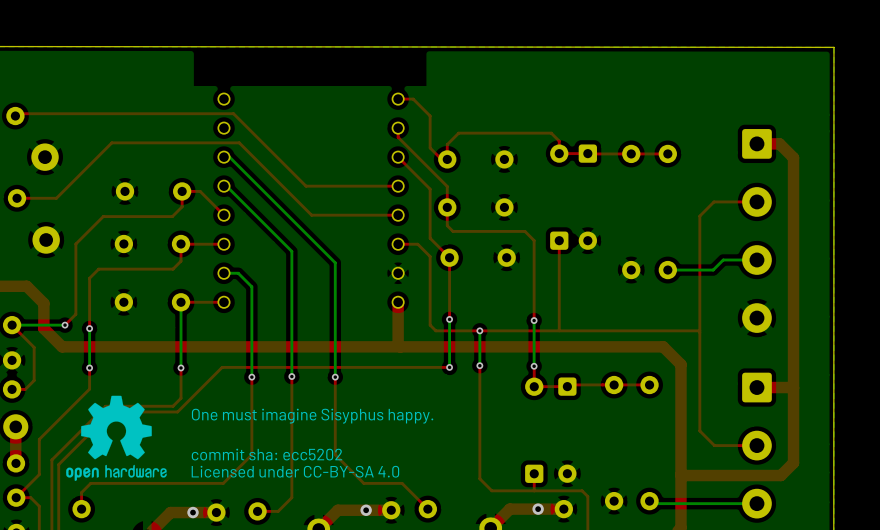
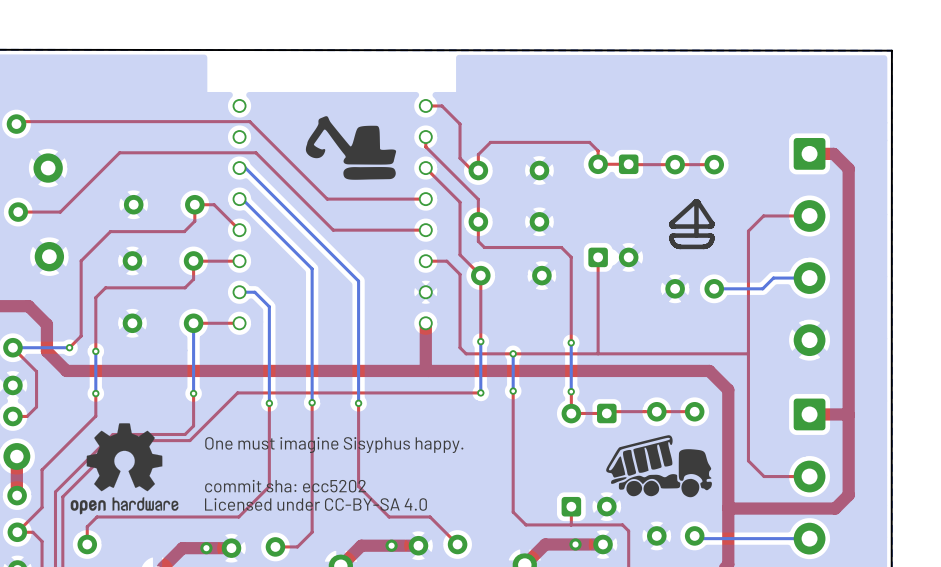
drawing: none -> [305, 116, 397, 180]
line: none -> (696, 201) (696, 235)
line: none -> (694, 202) (672, 222)
line: none -> (698, 202) (711, 222)
line: none -> (710, 226) (673, 226)
line: none -> (710, 235) (673, 235)
line: none -> (712, 237) (709, 244) (703, 246) (677, 246) (673, 243) (671, 237)
drawing: none -> [606, 435, 712, 498]

